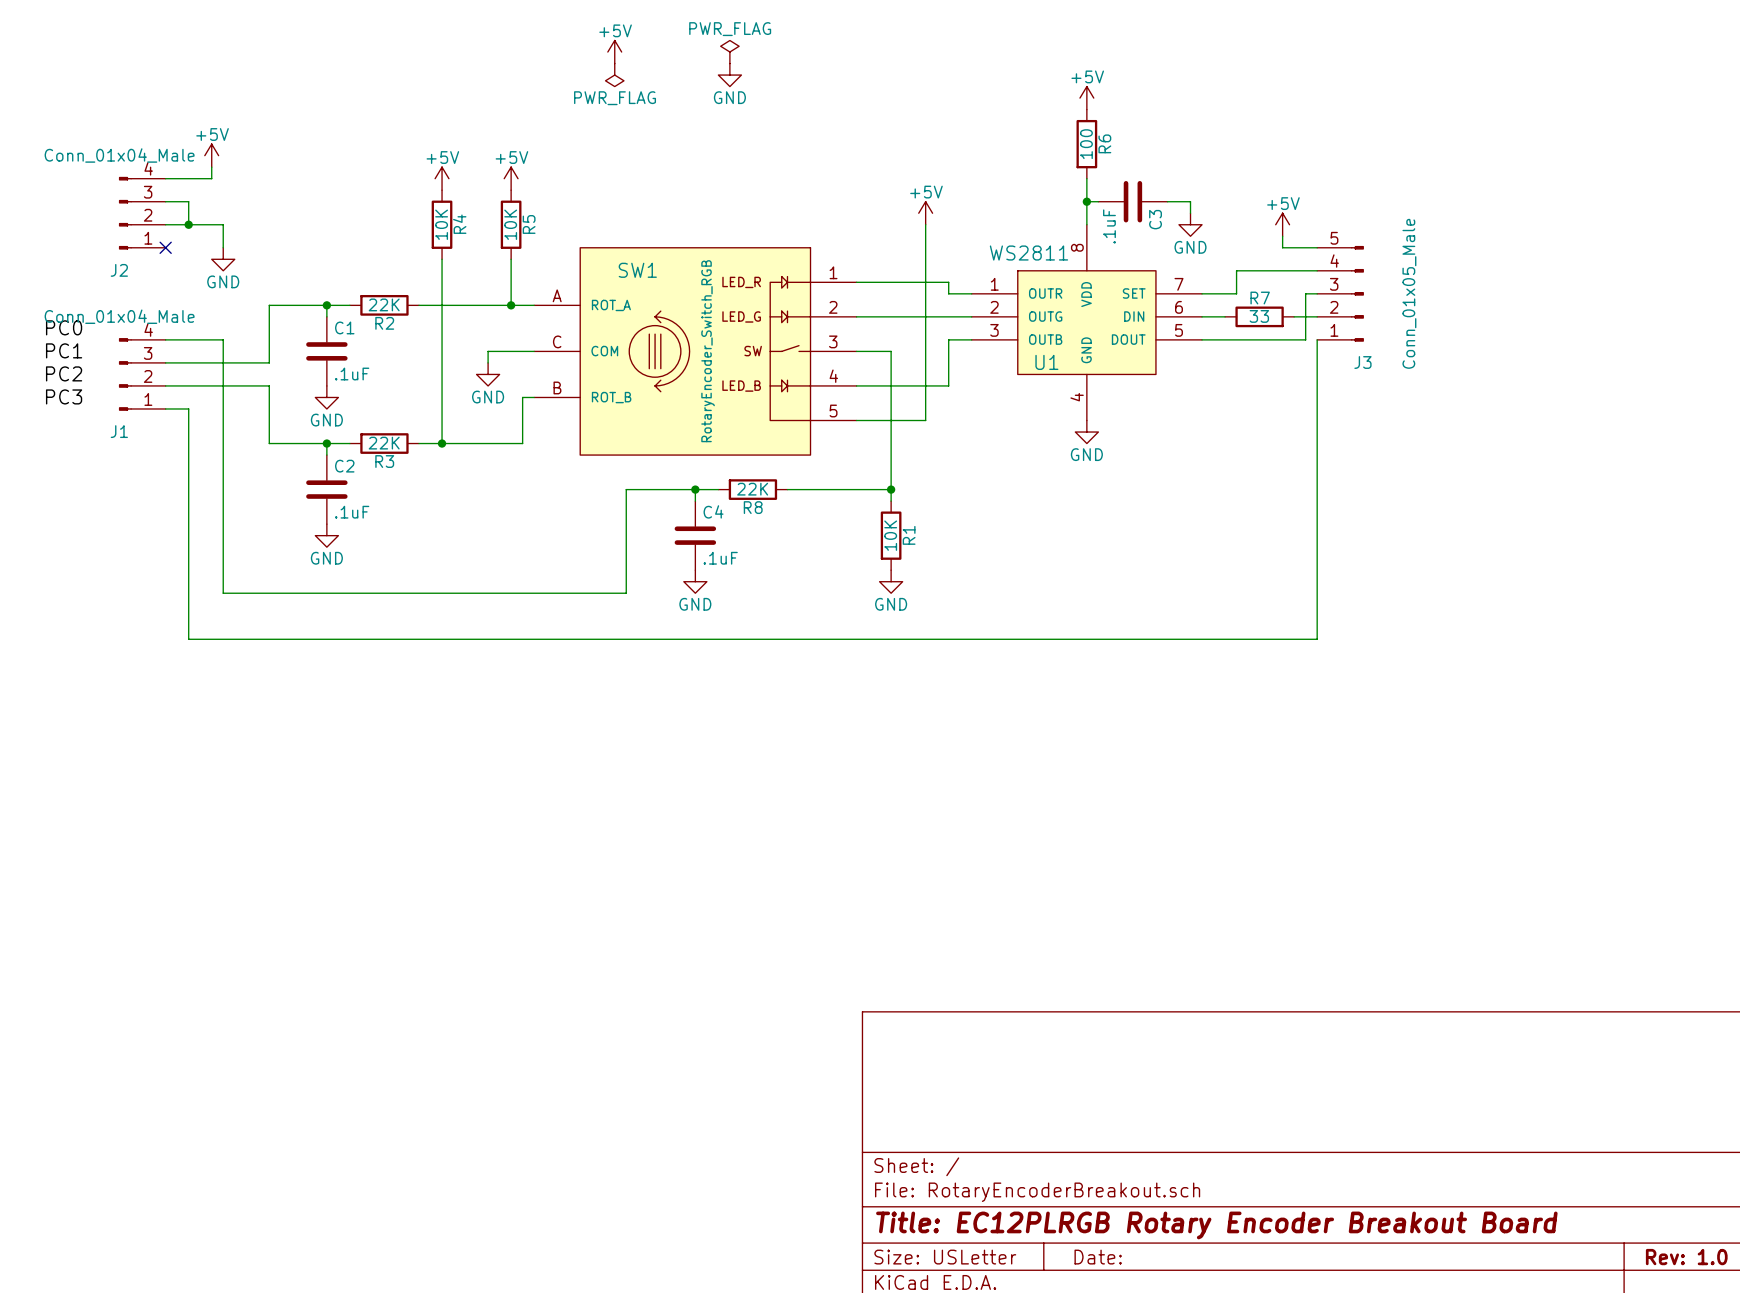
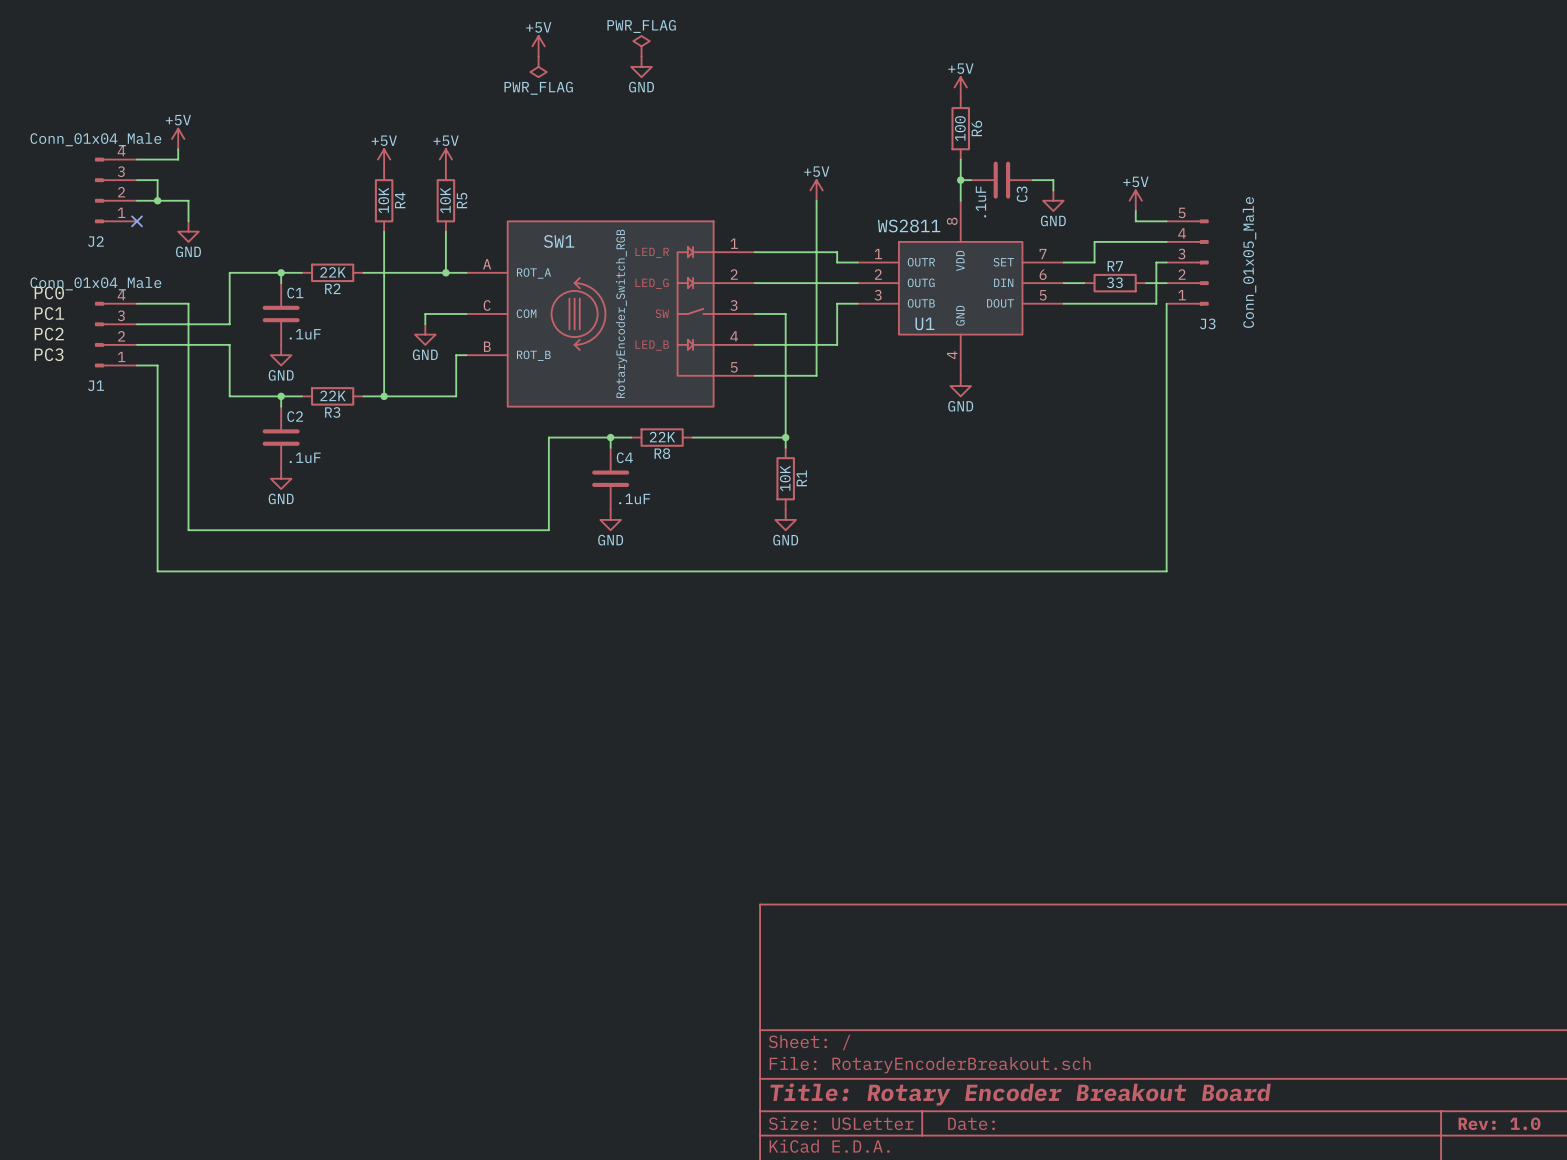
title block: Title: EC12PLRGB Rotary Encoder Breakout Board (1216, 1225) -> Title: Rotary Encoder Breakout Board (1020, 1094)

